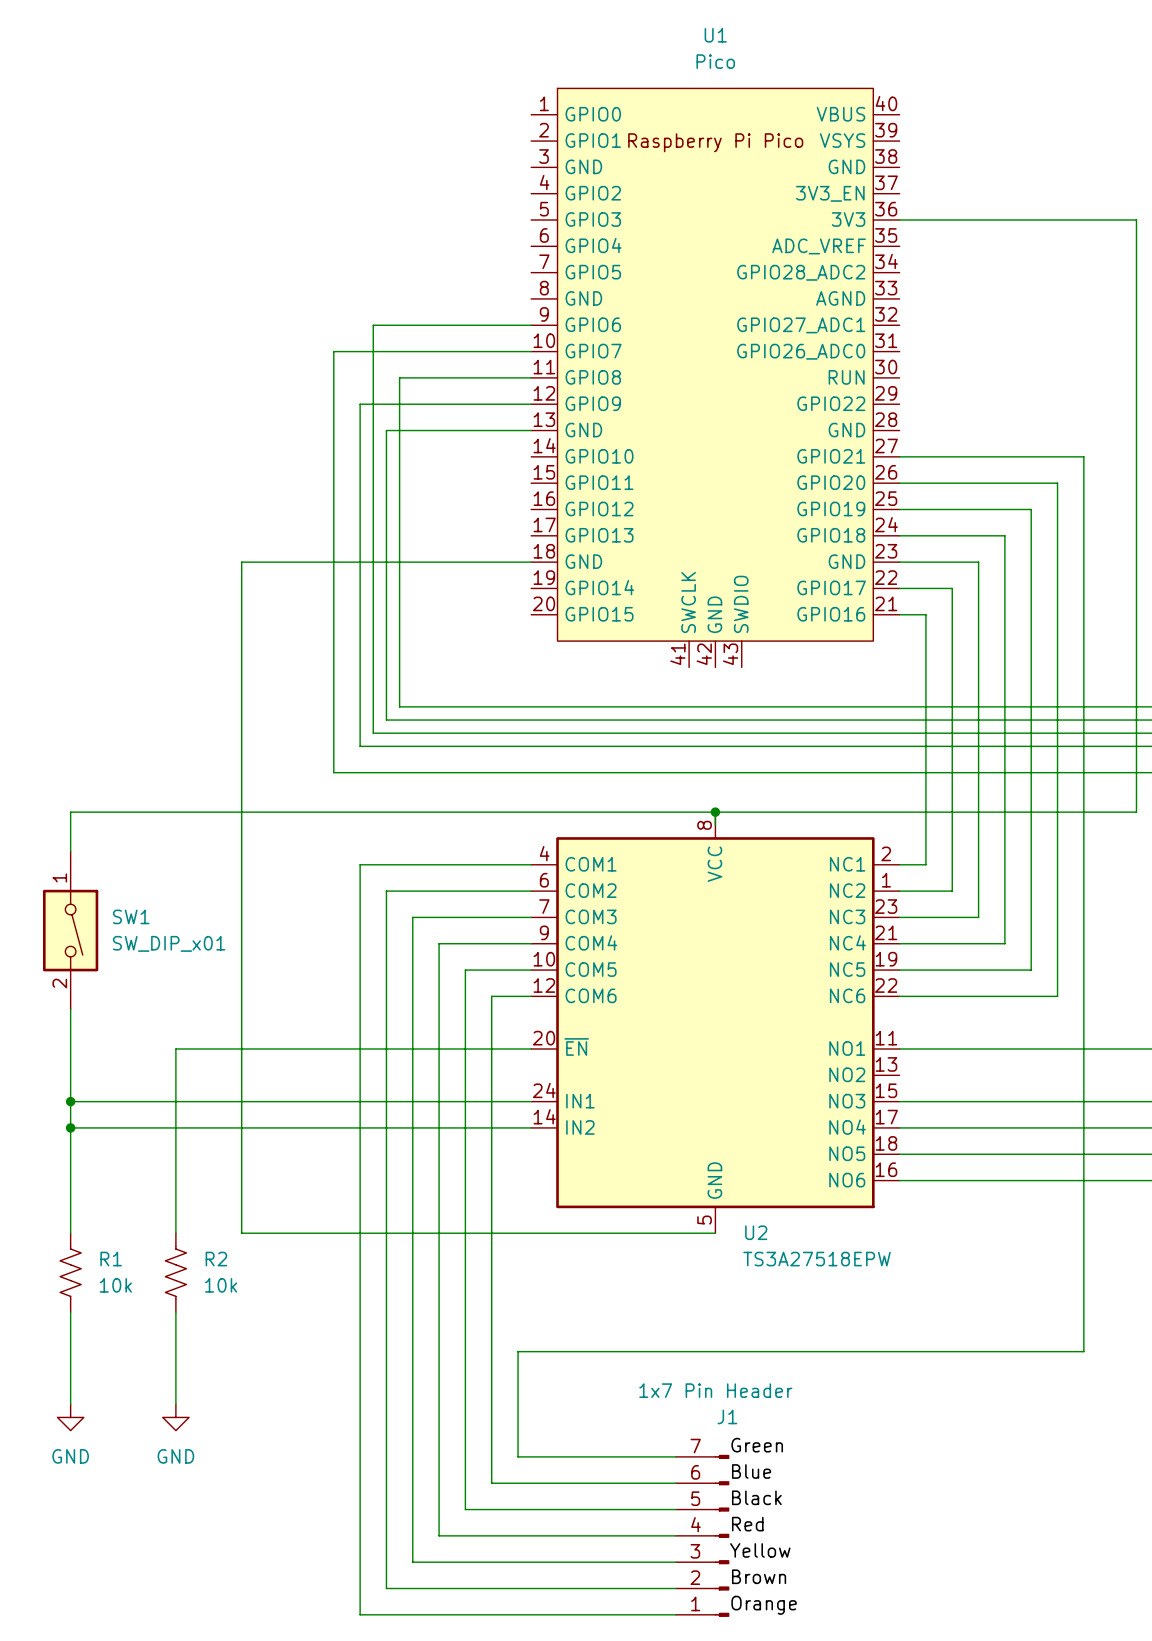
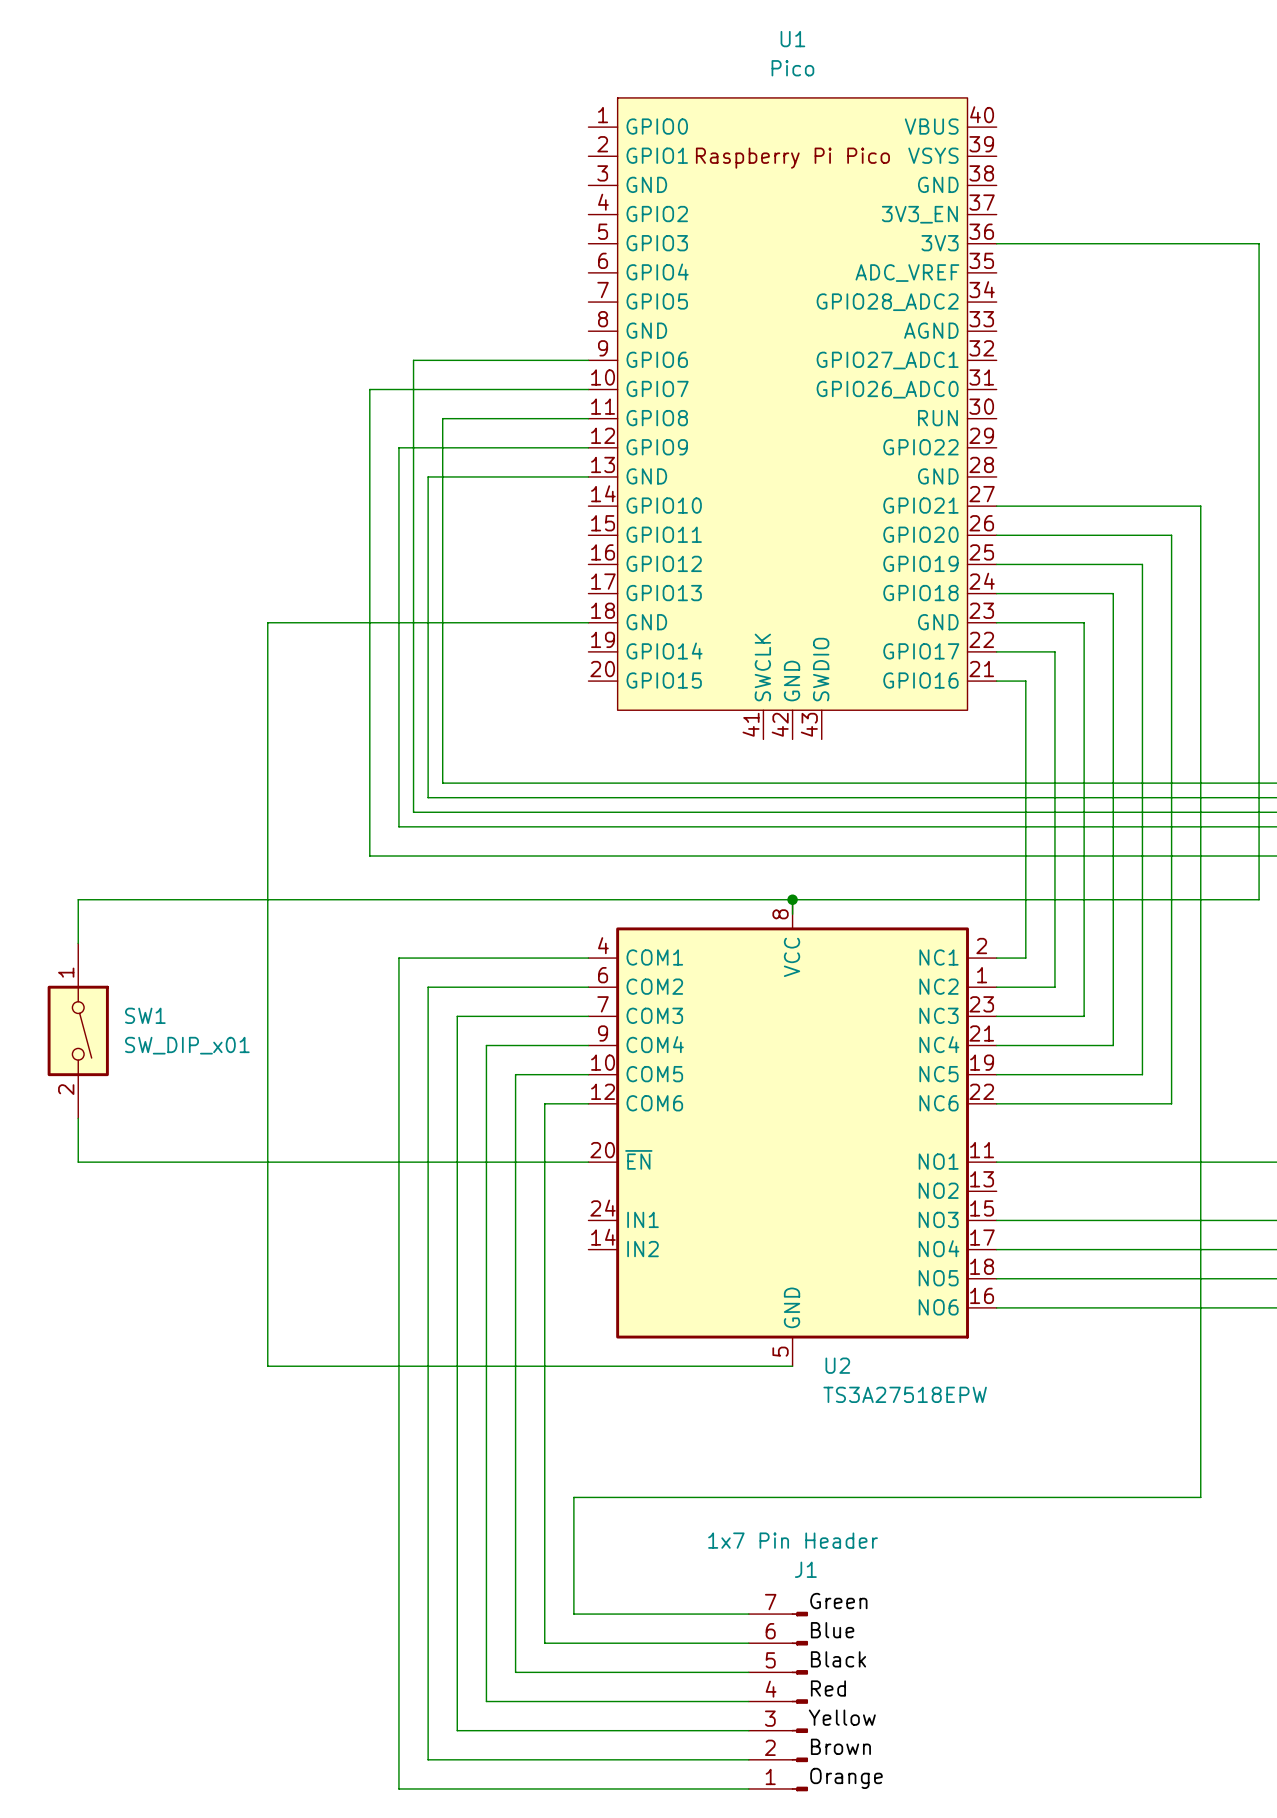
wire: (70, 1049) (70, 1233) -> (78, 1162) (194, 1162)
wire: (175, 1049) (175, 1233) -> none
wire: (70, 1101) (531, 1101) -> none
junction: (70, 1101) -> none
wire: (70, 1127) (531, 1127) -> none
junction: (70, 1127) -> none
R1: 10k (70, 1272) -> none
R2: 10k (175, 1272) -> none
wire: (70, 1312) (70, 1404) -> none
wire: (175, 1312) (175, 1404) -> none
power symbol: GND (70, 1417) -> none
power symbol: GND (175, 1417) -> none

